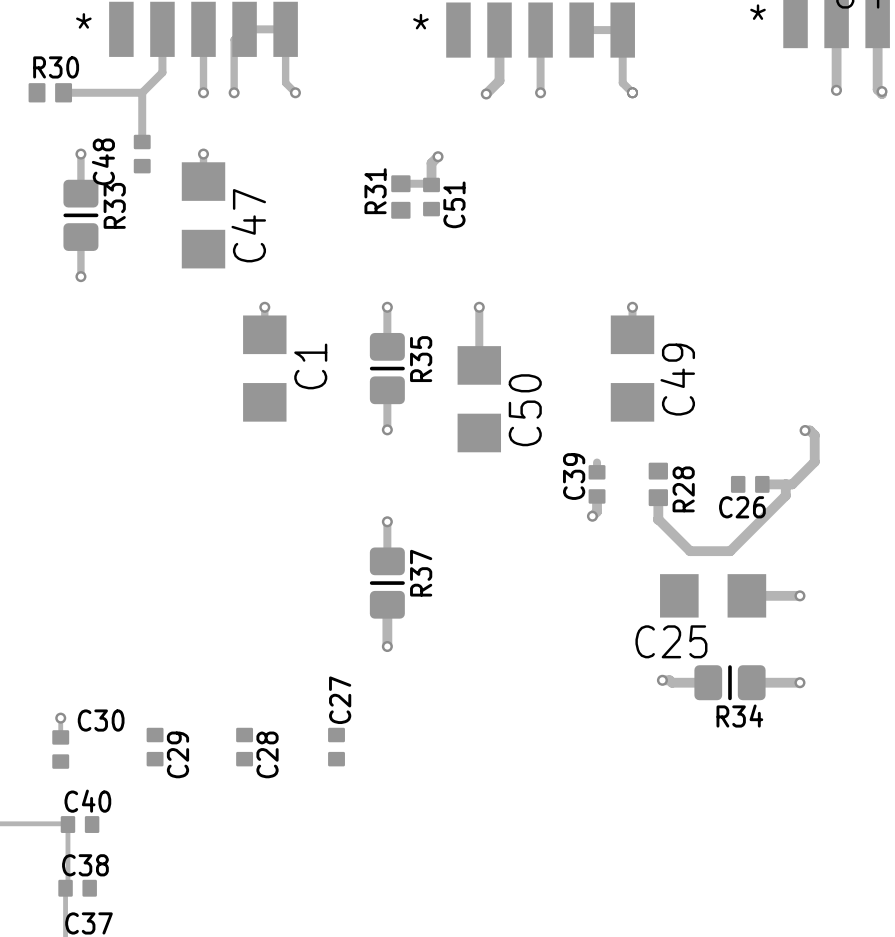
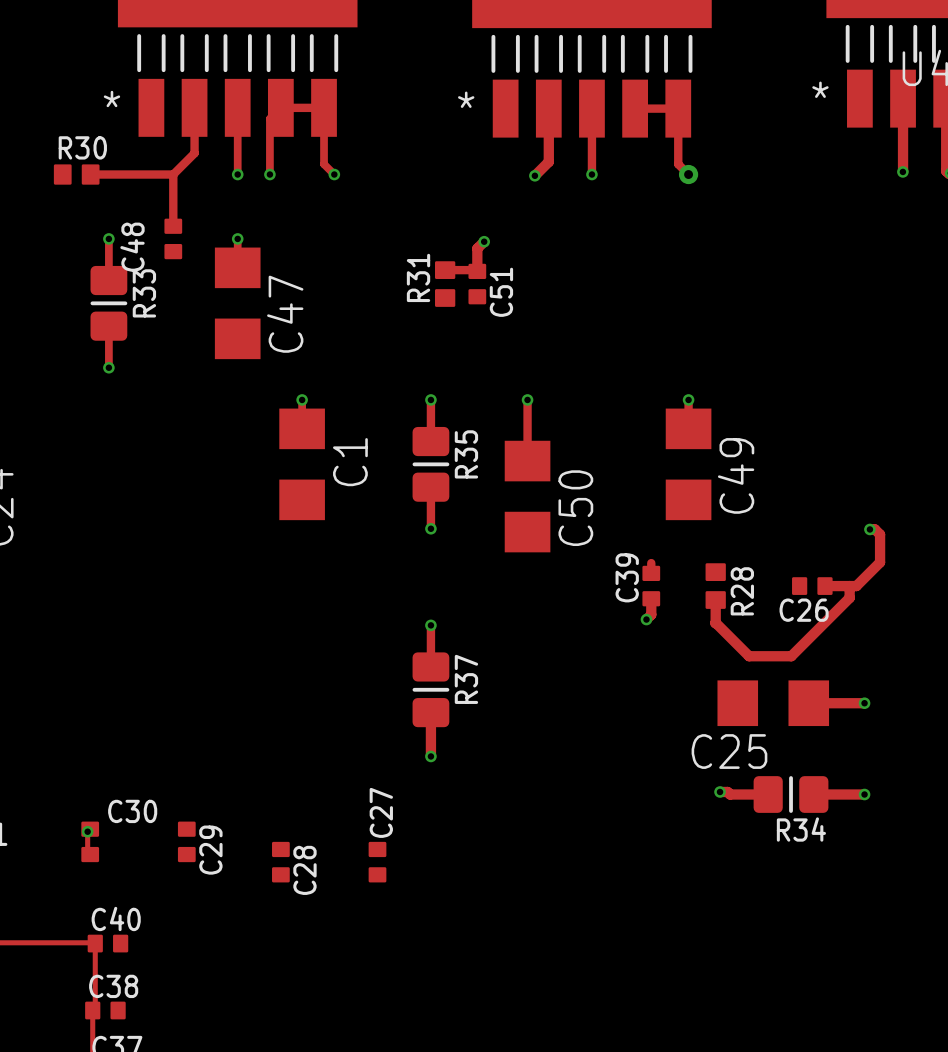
via: none -> (688, 174)
C29 position: (155, 747) -> (186, 841)
C30 position: (60, 749) -> (90, 841)

